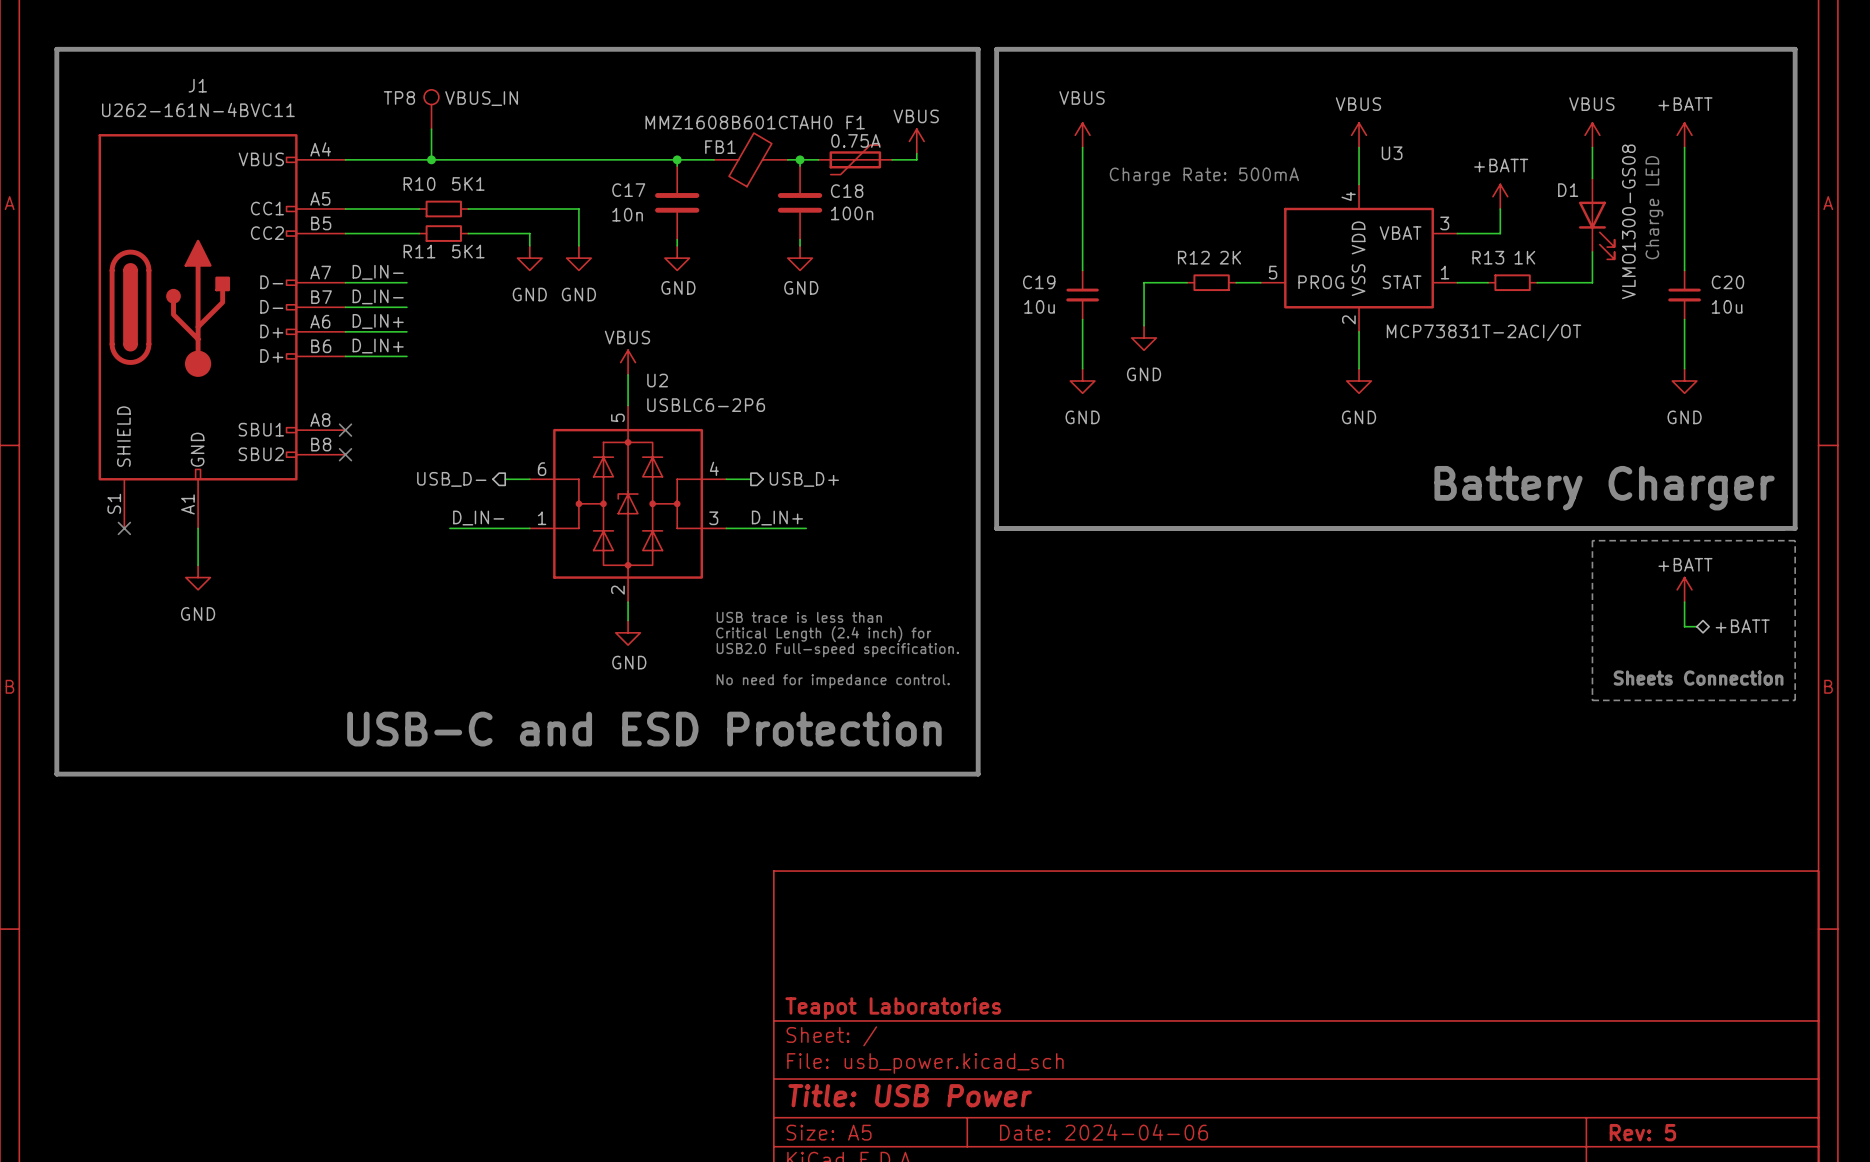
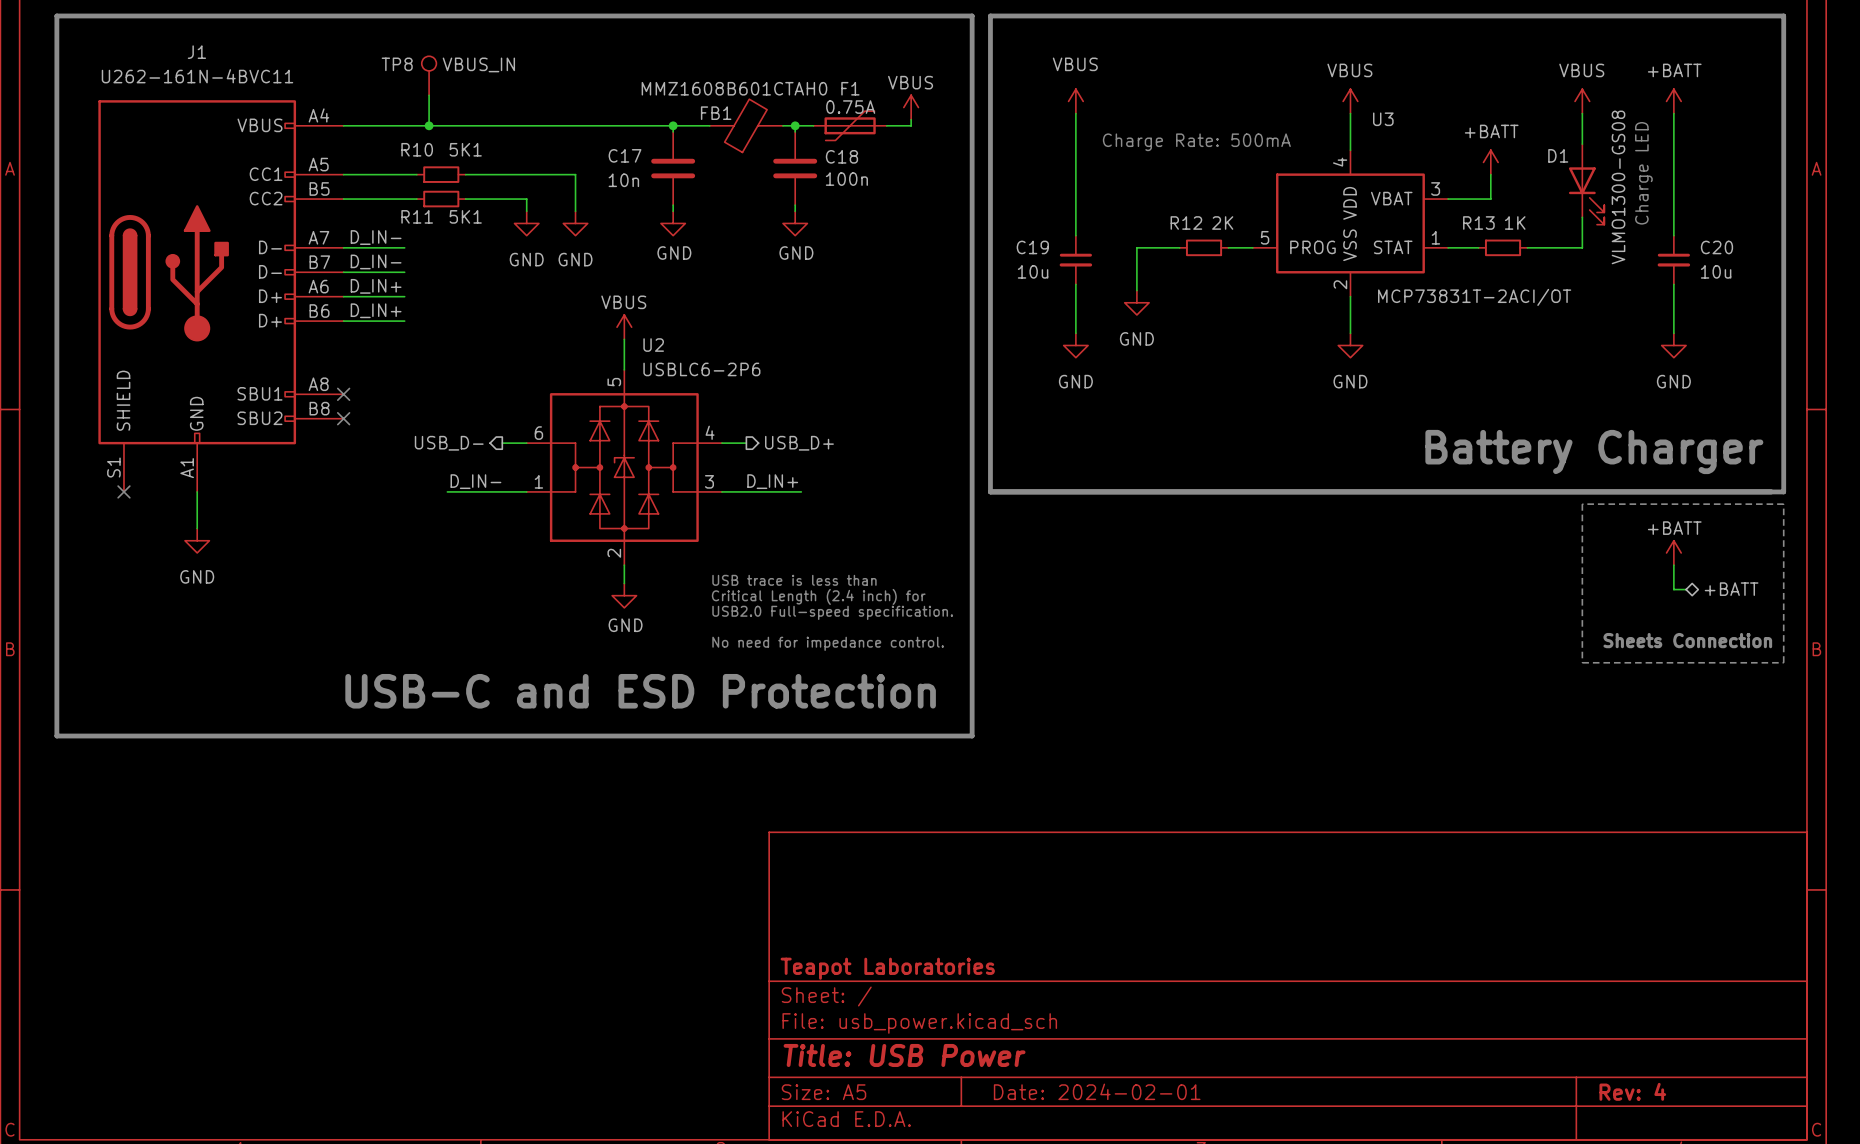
title block: Date: 2024-04-06 (1104, 1132) -> Date: 2024-02-01 (1097, 1091)
title block: Rev: 5 (1642, 1132) -> Rev: 4 (1632, 1091)

